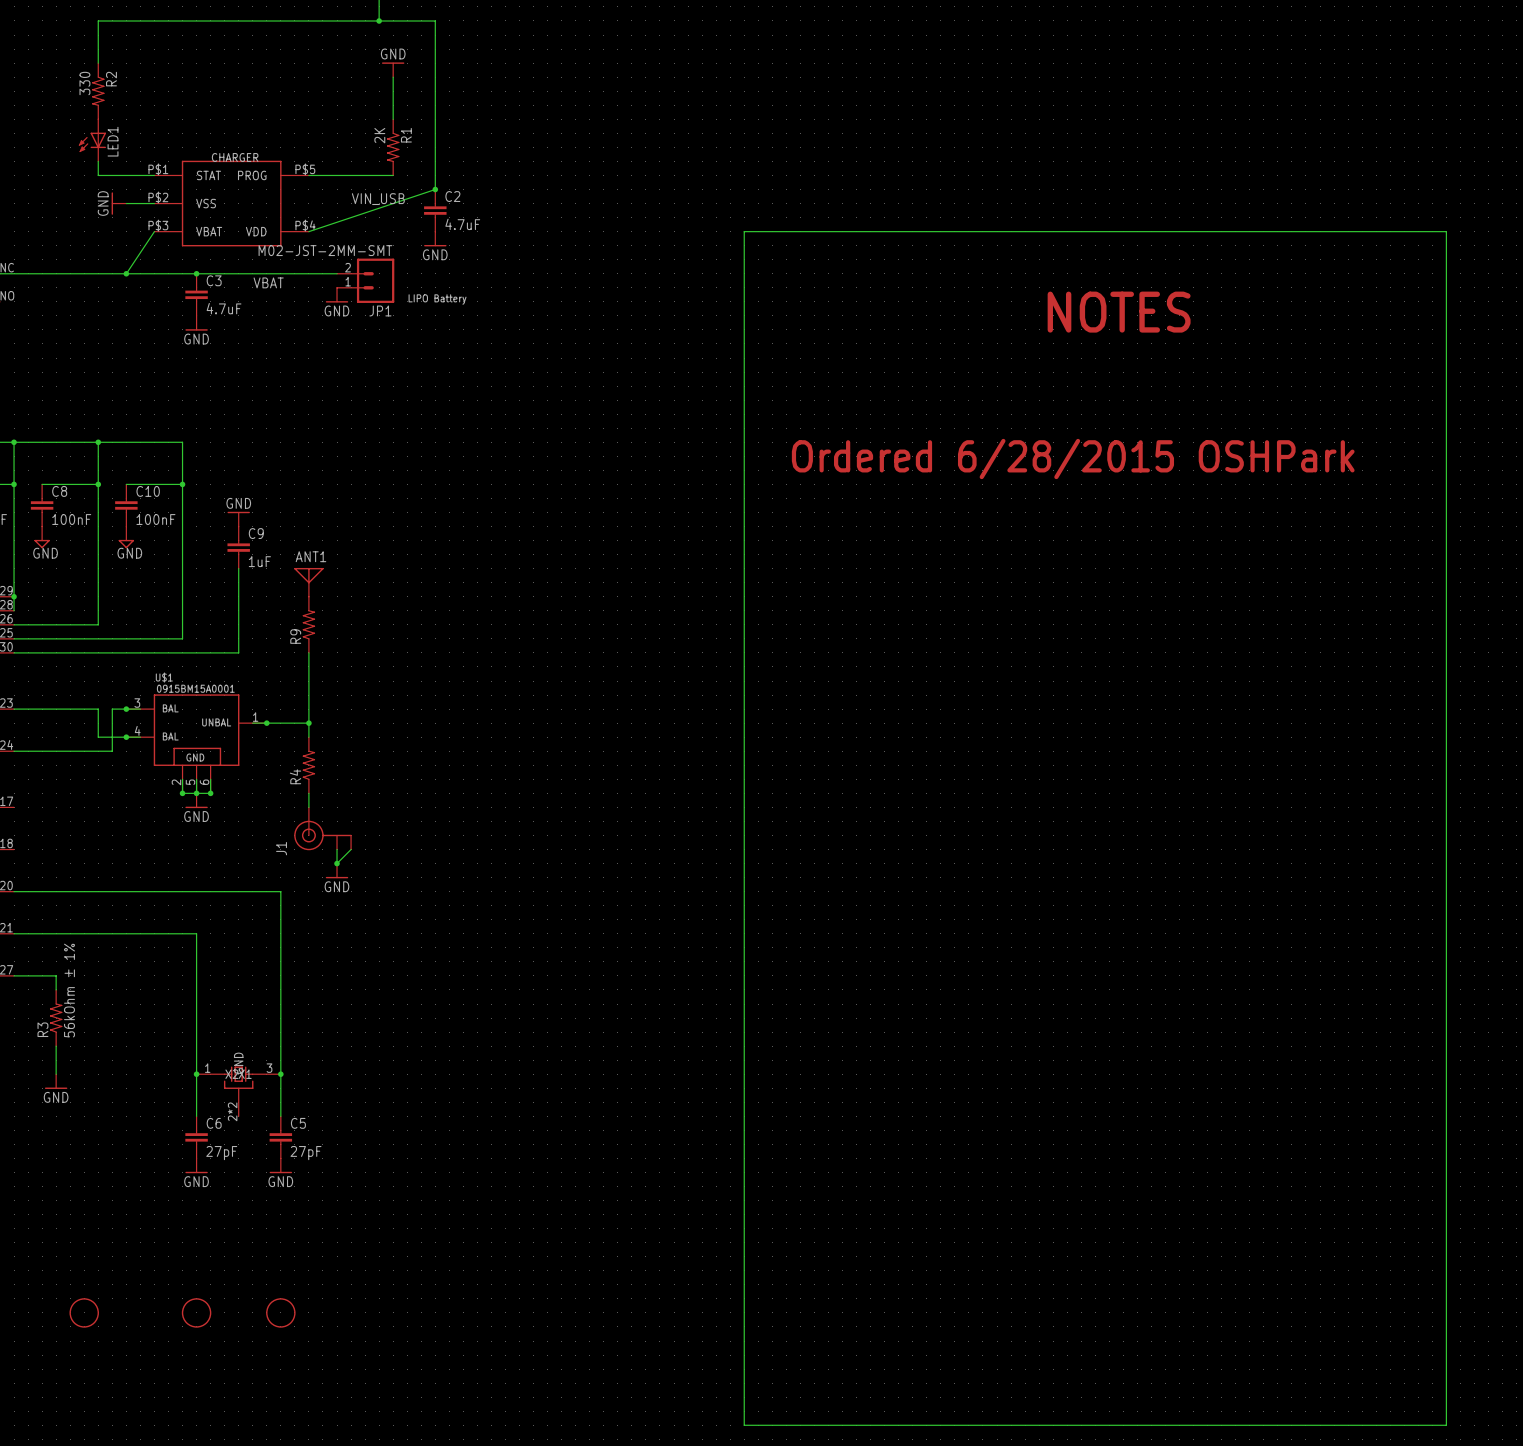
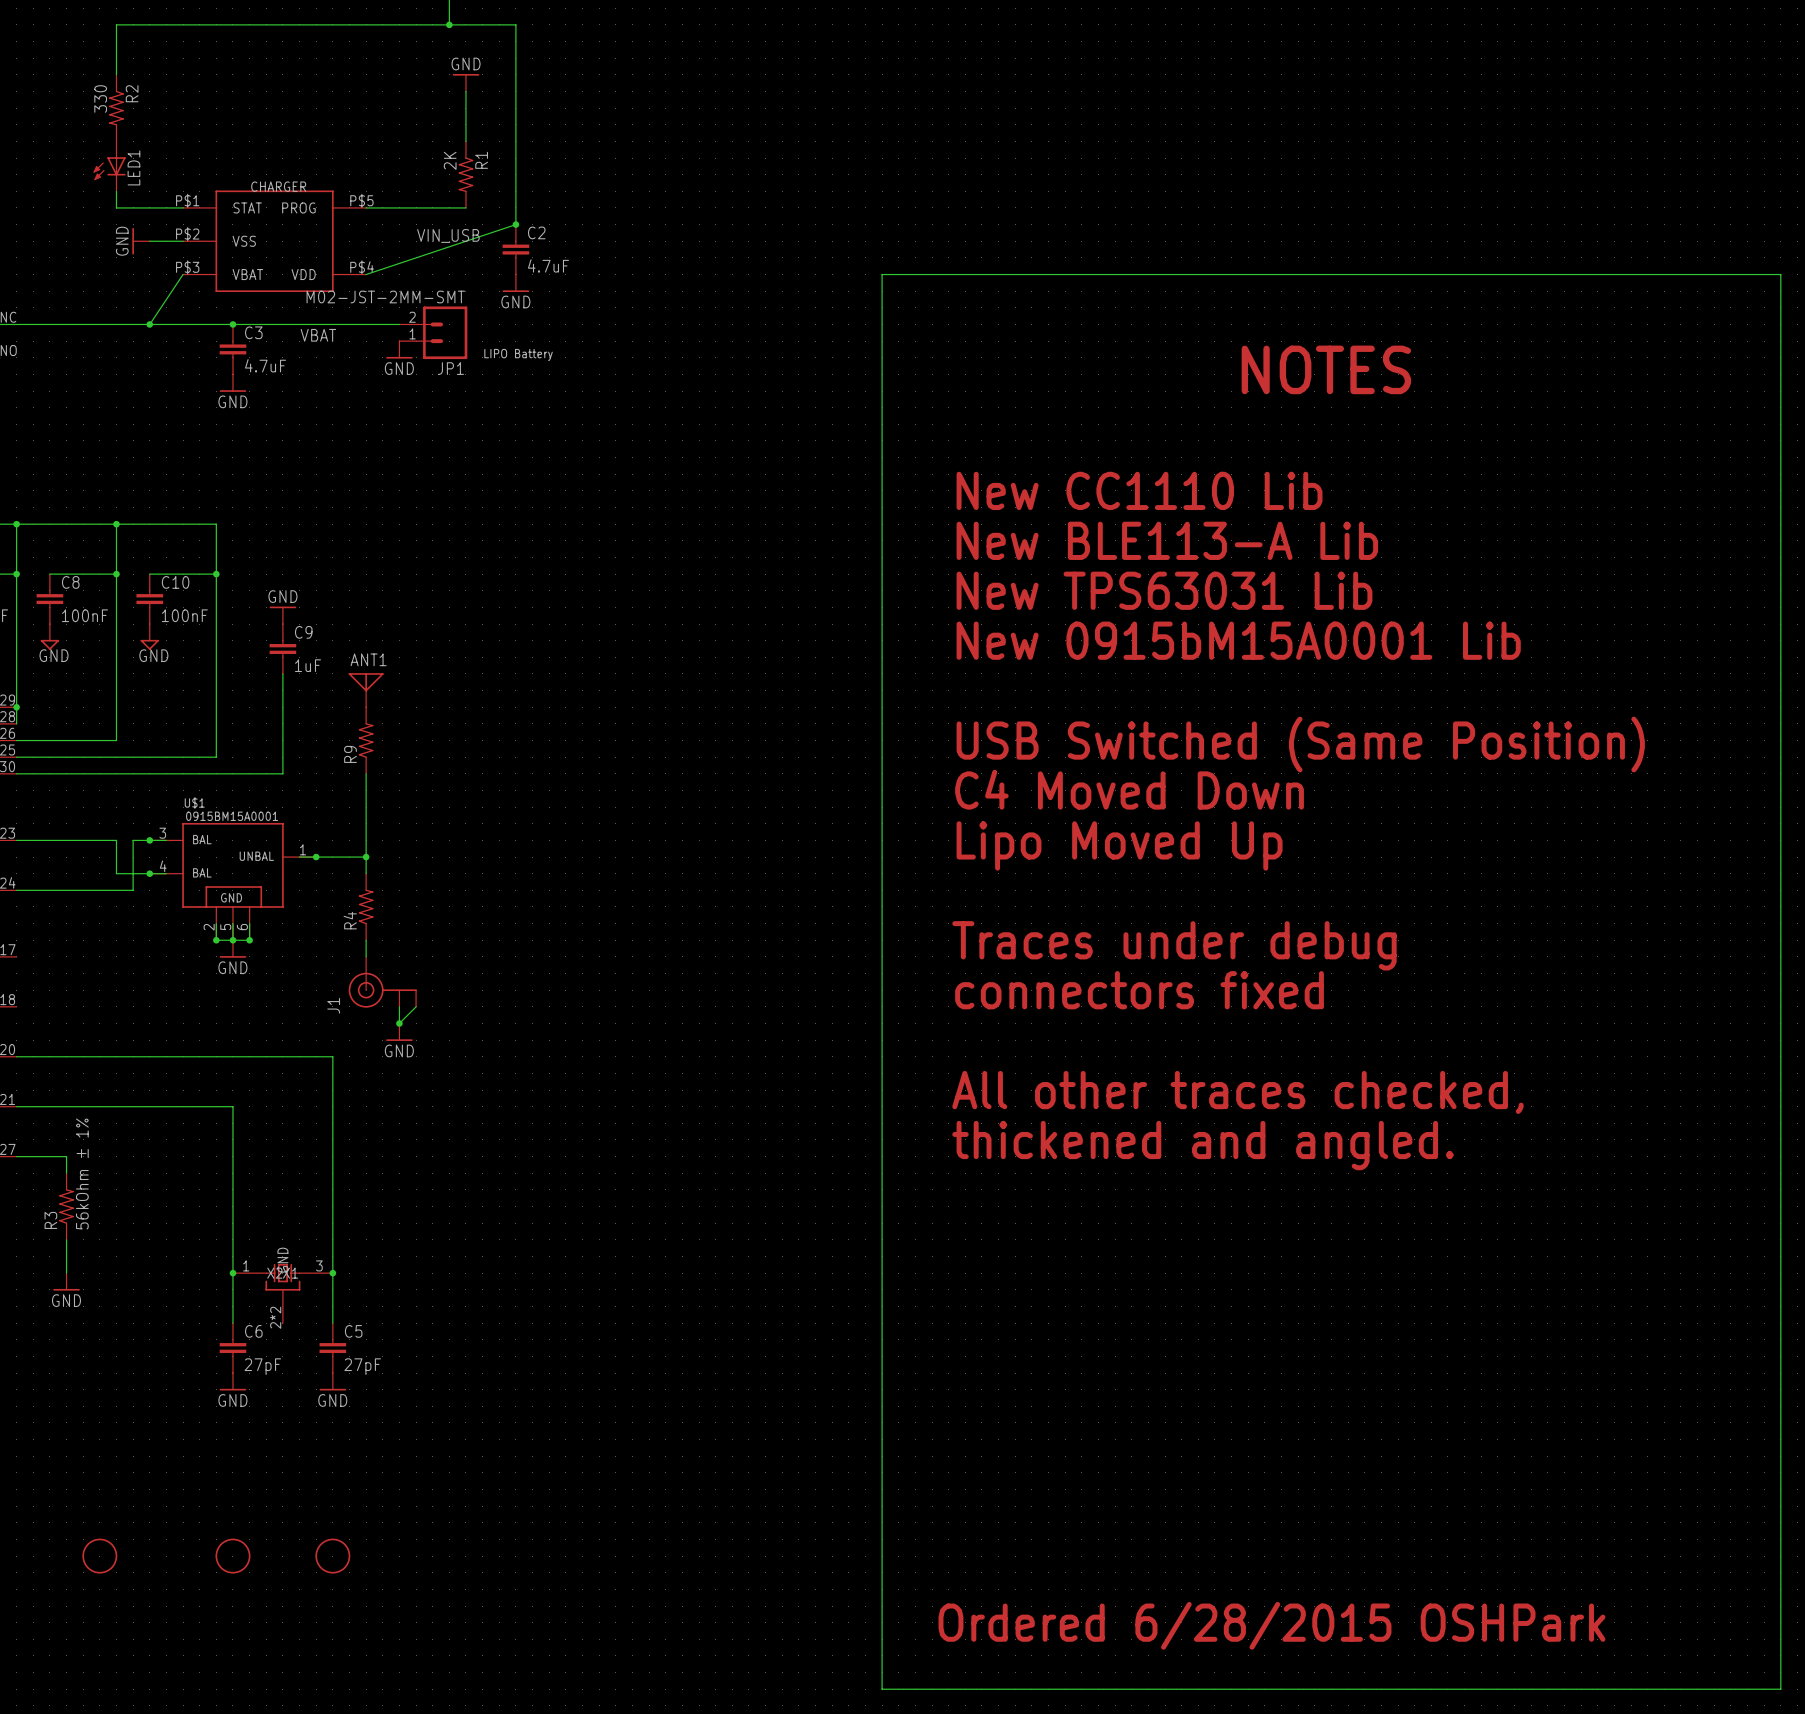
wire: (1446, 231) (1446, 1425) -> (1714, 274) (1780, 274) (1780, 1689) (1714, 1689)
text: none -> New CC1110 Lib (1139, 490)
text: none -> New BLE113-A Lib (1167, 540)
text: Ordered 6/28/2015 OSHPark (1073, 459) -> none
text: none -> New TPS63031 Lib (1164, 590)
text: none -> New 0915bM15A0001 Lib (1238, 640)
text: none -> USB Switched (Same Position) (1300, 744)
text: none -> C4 Moved Down (1129, 789)
text: none -> Lipo Moved Up (1119, 845)
text: none -> Traces under debug (1174, 945)
text: none -> connectors fixed (1139, 990)
text: none -> All other traces checked, (1237, 1092)
text: none -> thickened and angled. (1203, 1145)
text: none -> Ordered 6/28/2015 OSHPark (1271, 1625)

